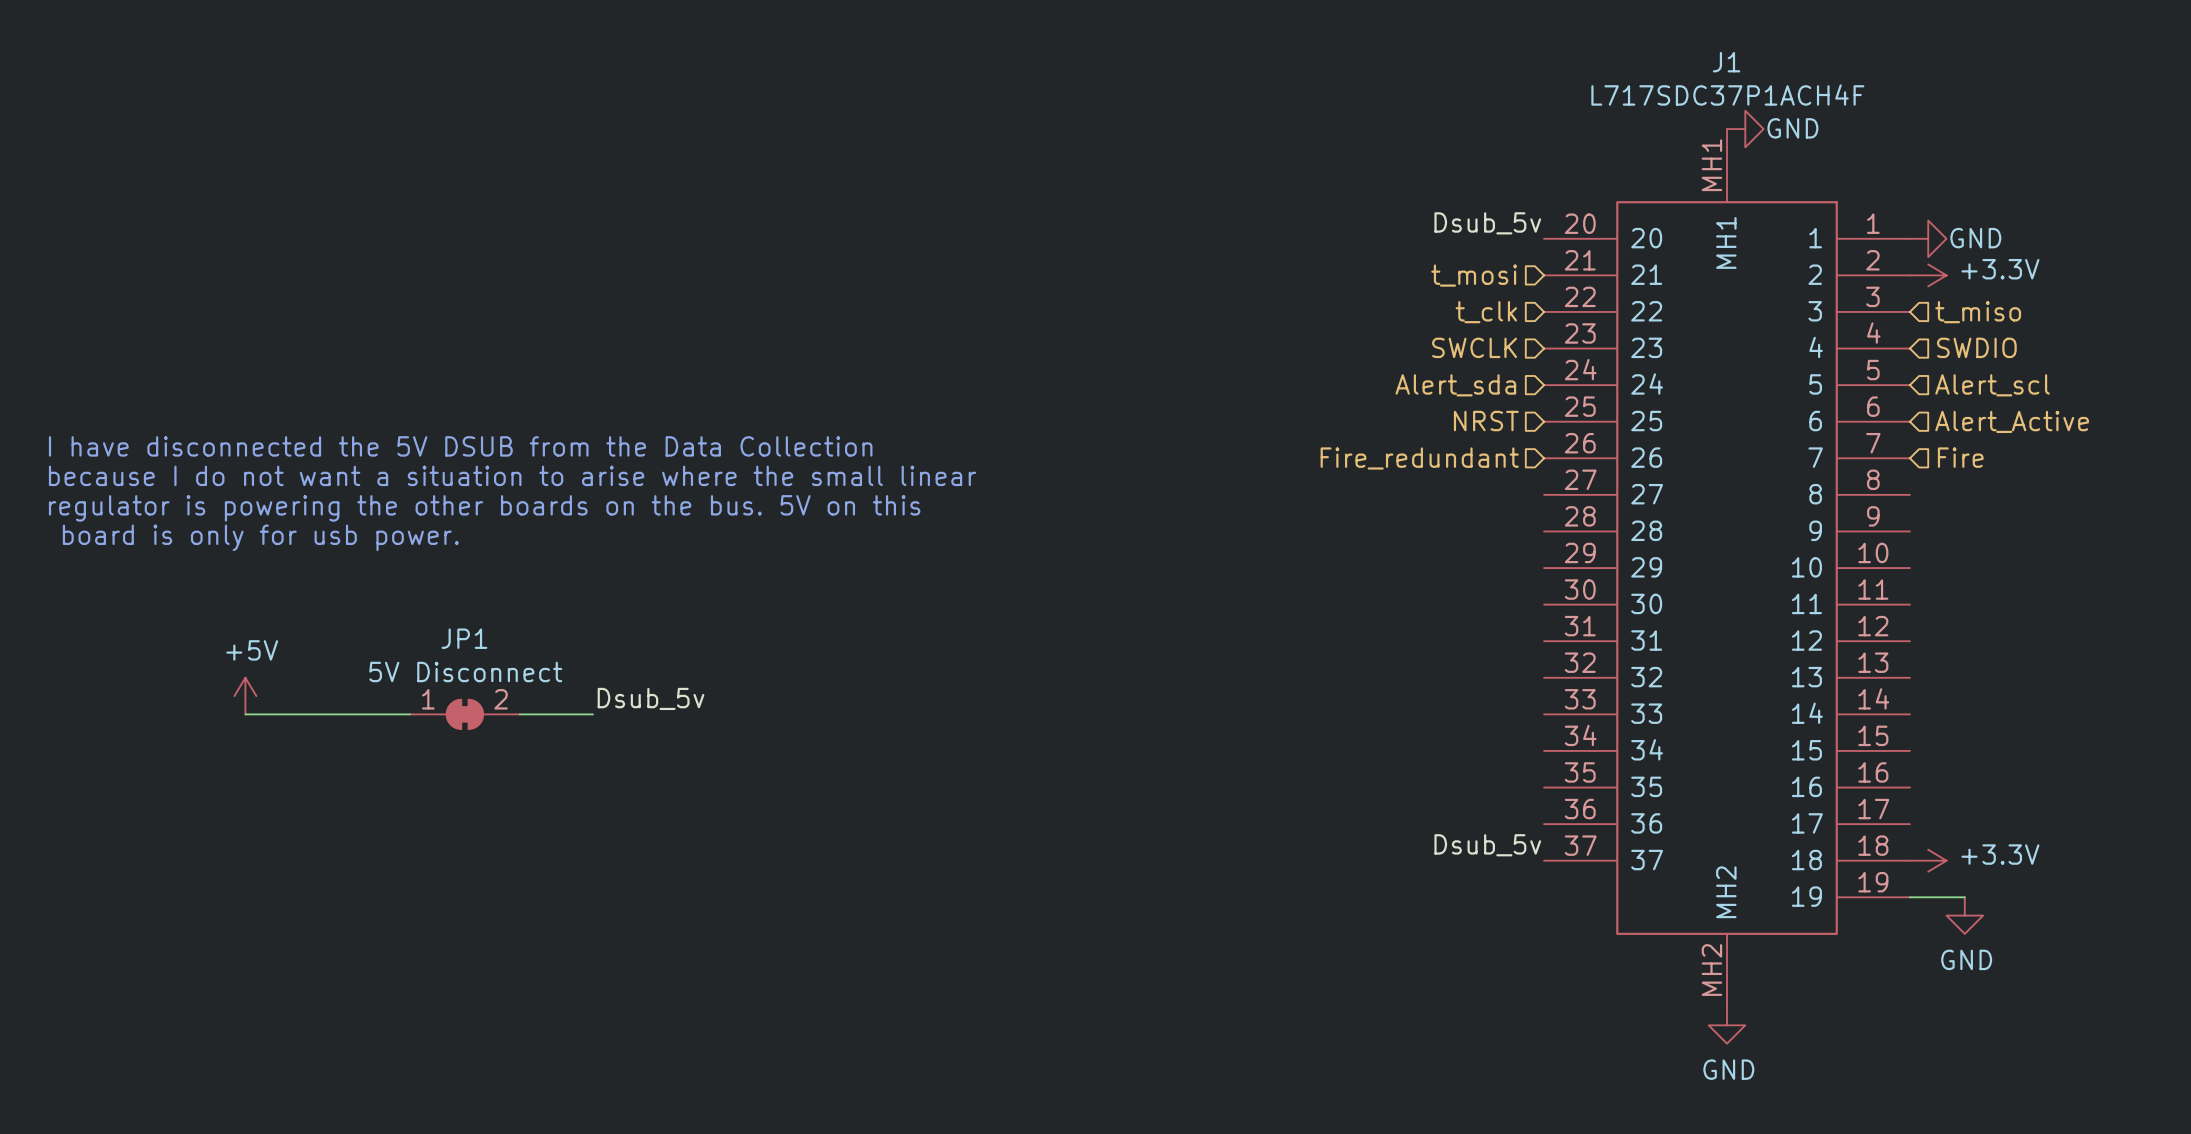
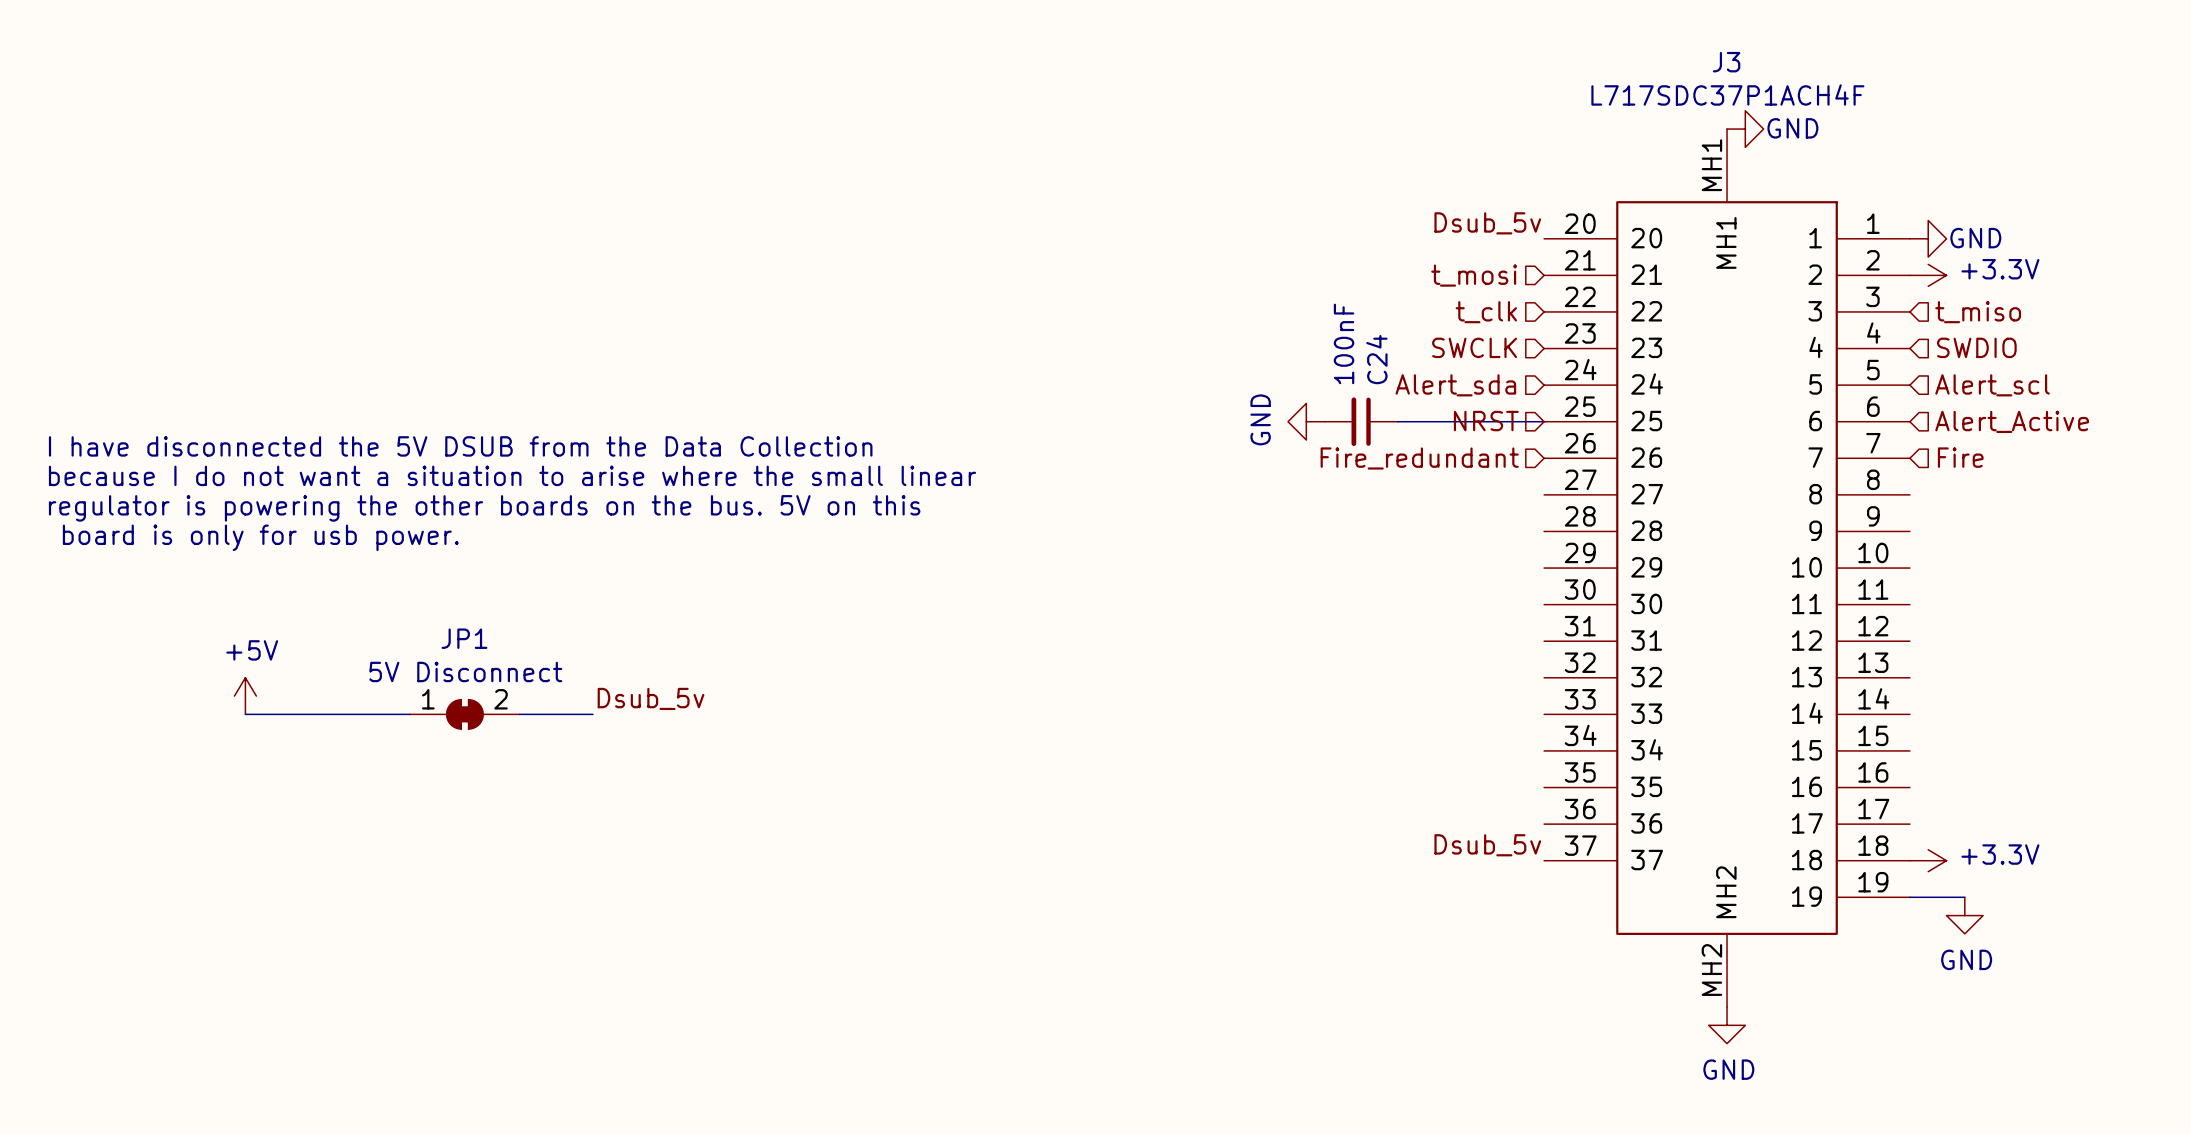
J1 name: J1 (1726, 62) -> J3 (1726, 62)
power symbol: none -> GND (1306, 421)
C24: none -> 100nF (1361, 421)
wire: none -> (1397, 421) (1544, 421)

